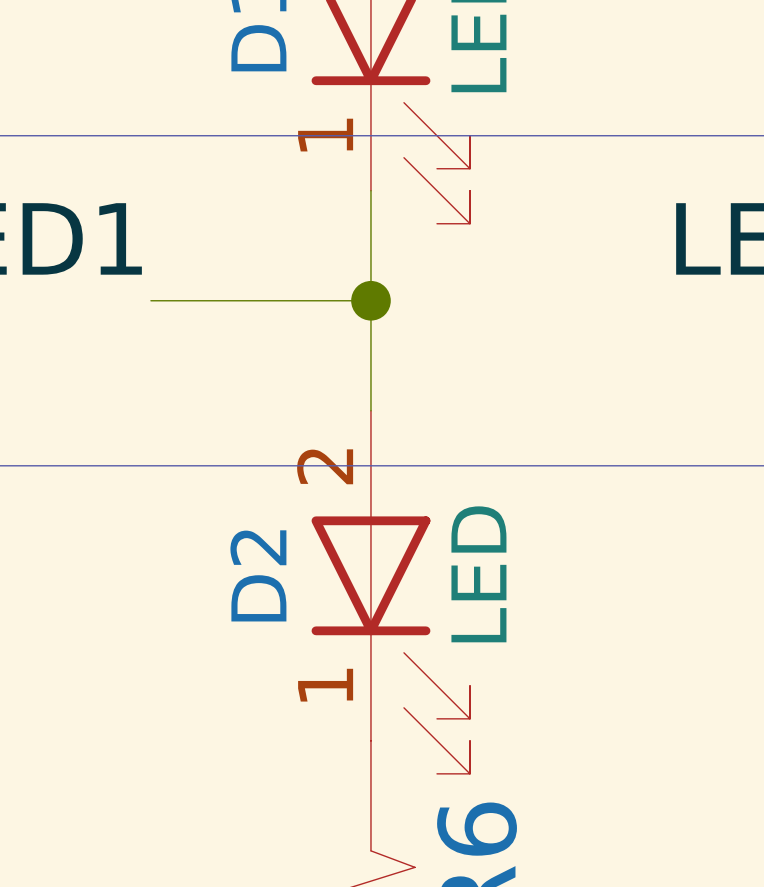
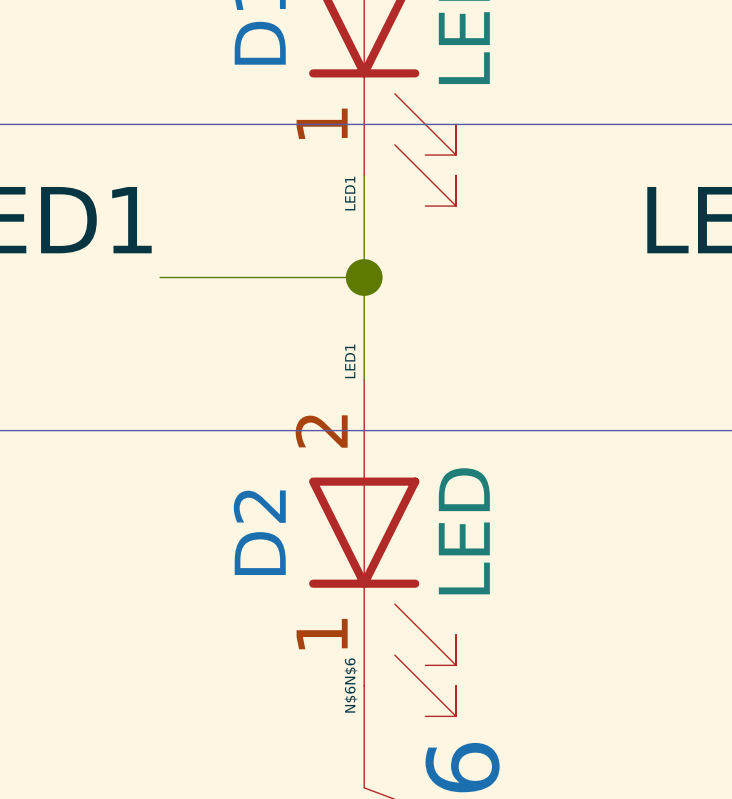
label: none -> LED1 (350, 193)
label: none -> LED1 (350, 361)
label: none -> N$6 (351, 671)
label: none -> N$6 (351, 699)

